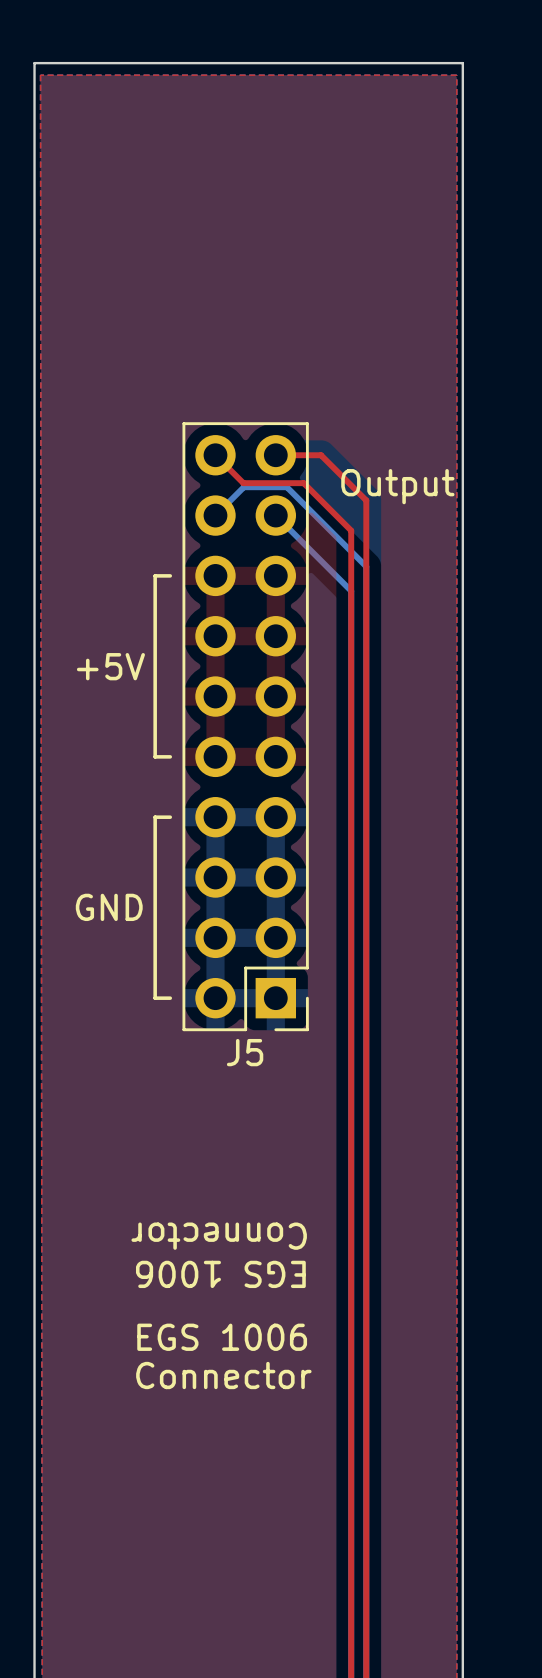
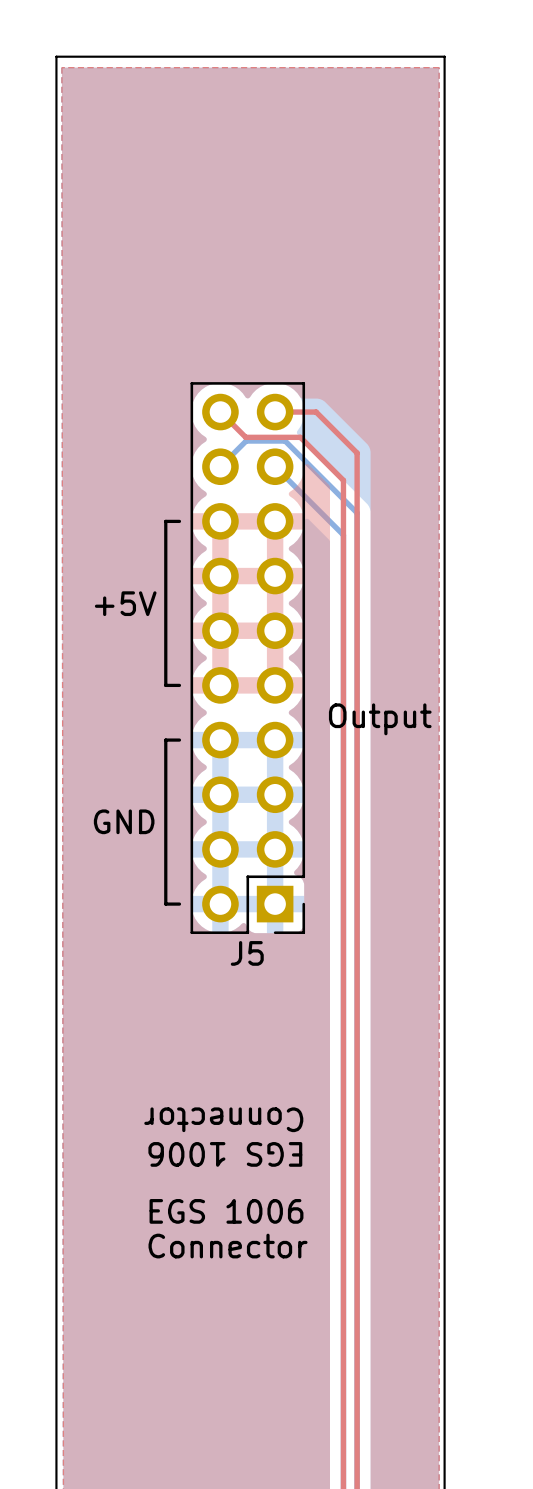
text position: Output (397, 486) -> Output (380, 719)

